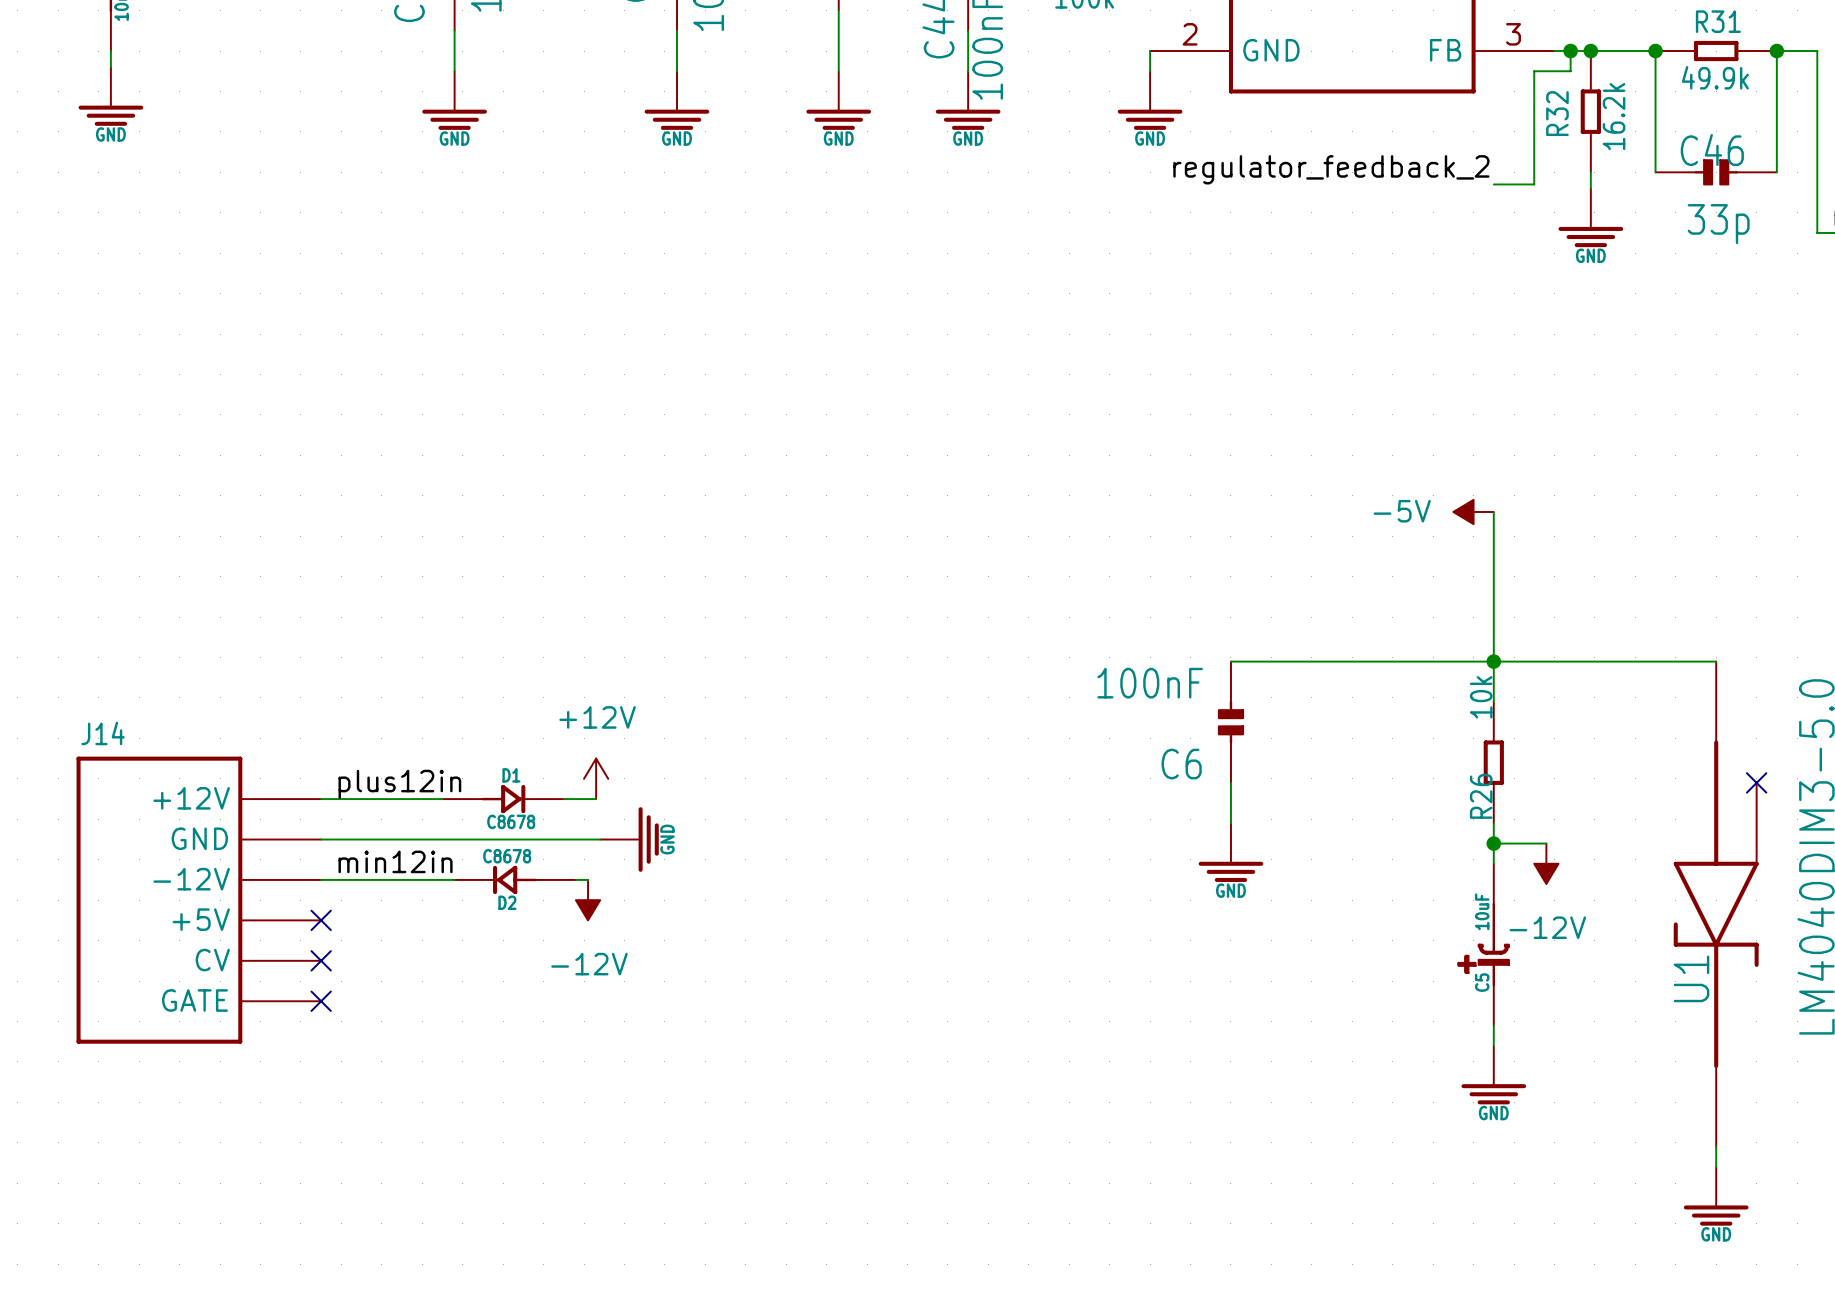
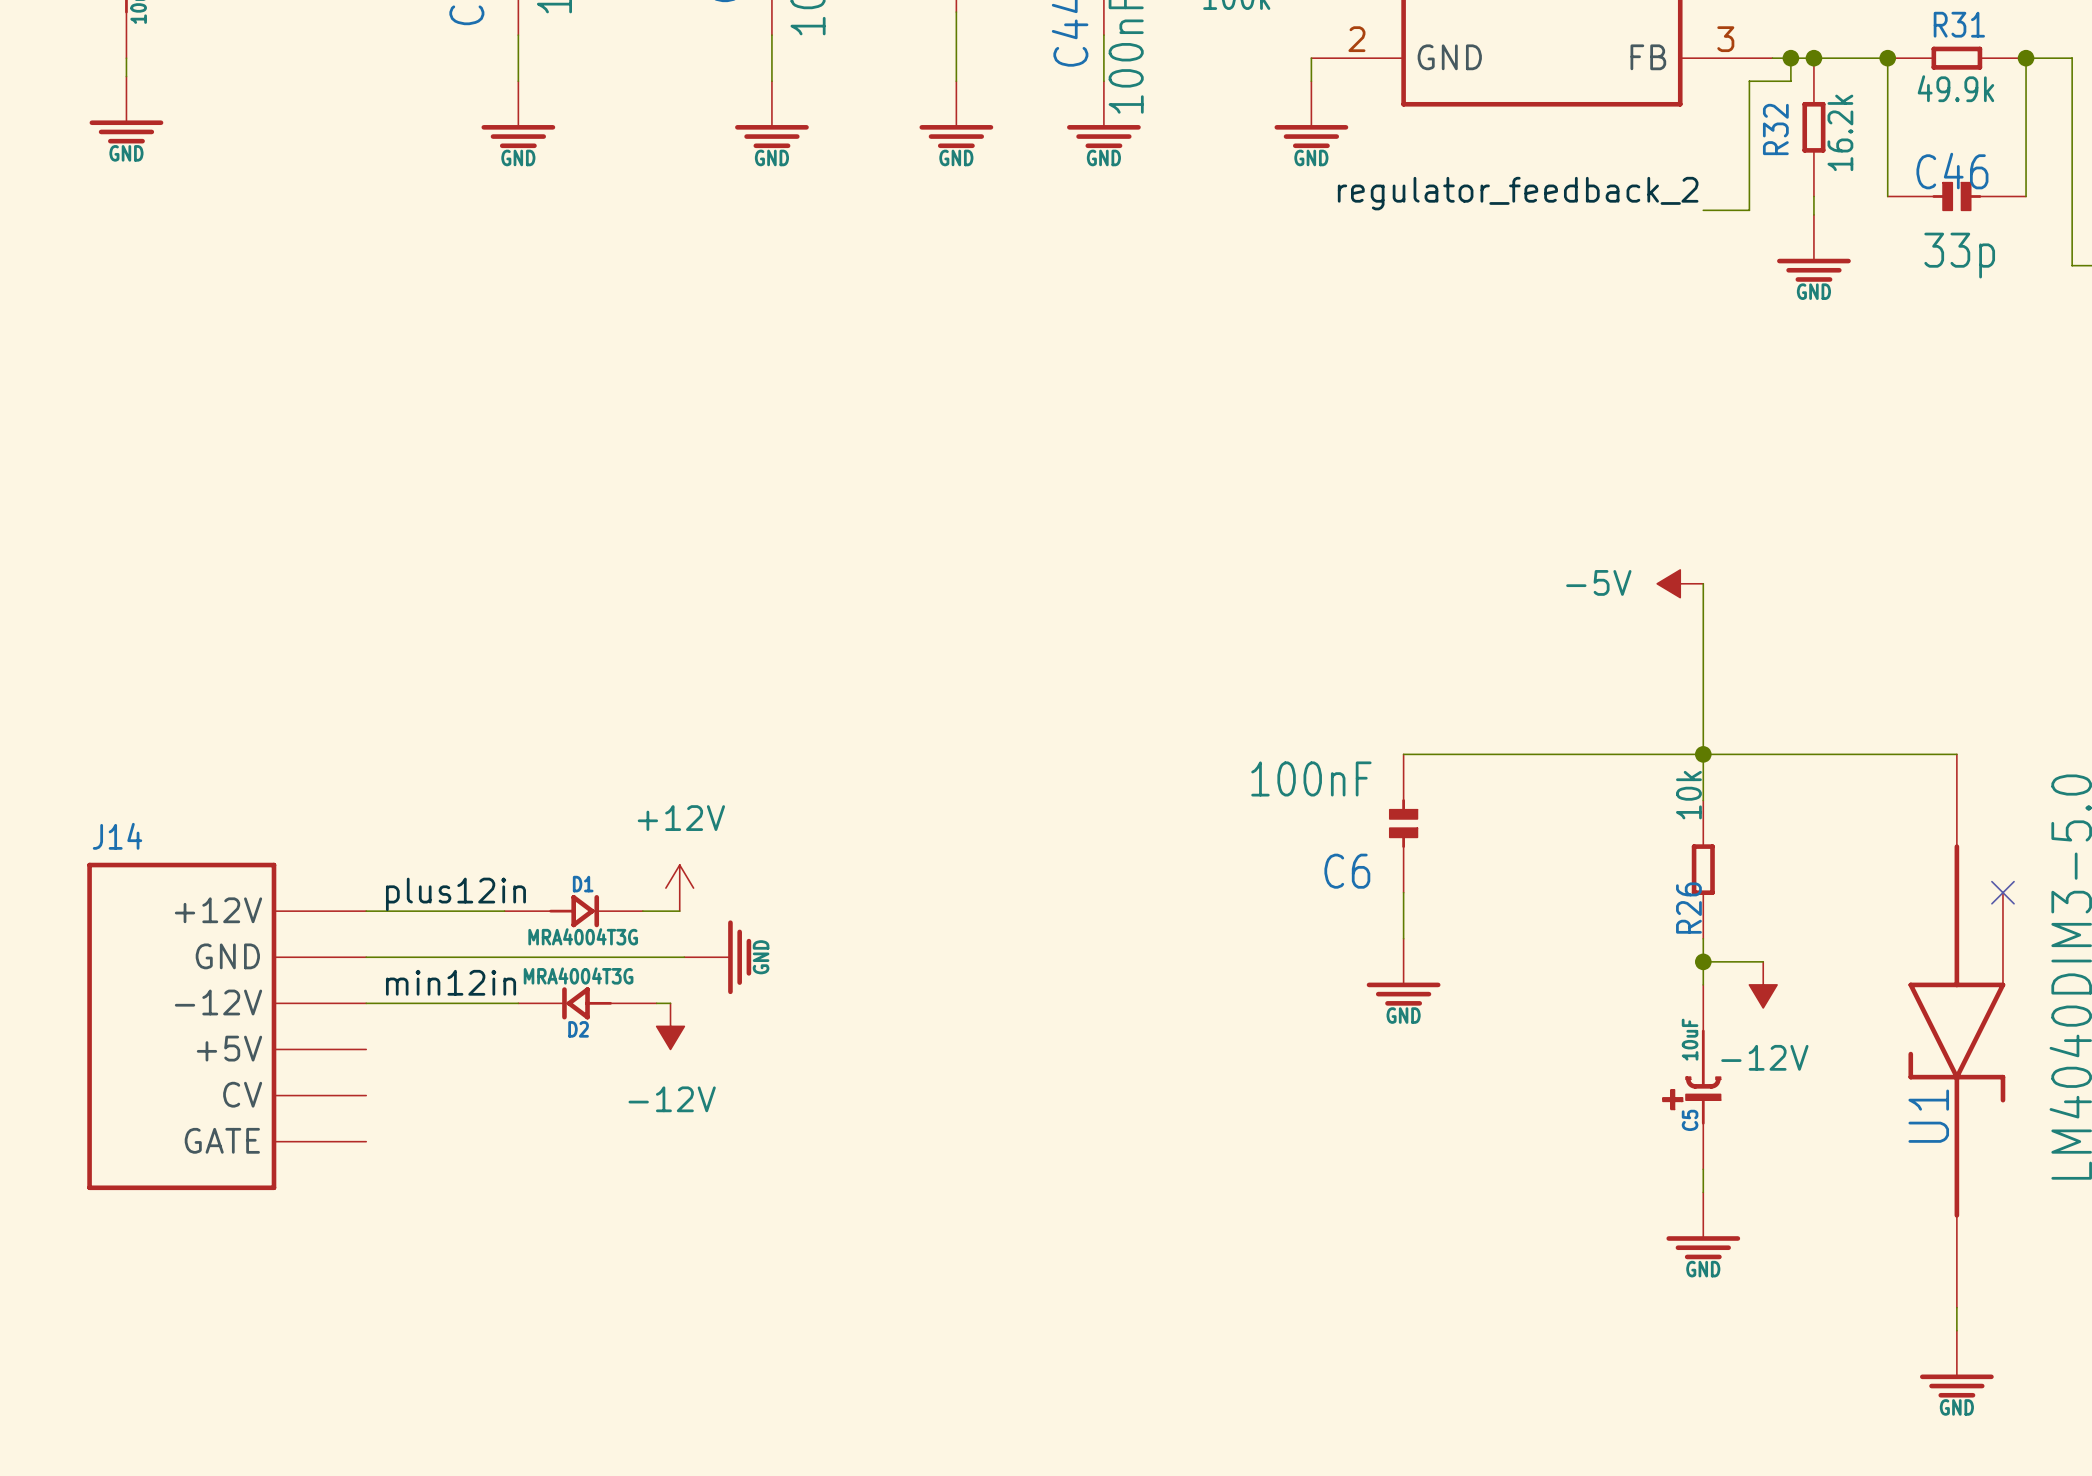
D1 value: C8678 (511, 821) -> MRA4004T3G (583, 936)
D2 value: C8678 (507, 856) -> MRA4004T3G (578, 975)
no-connect mark: (321, 920) -> none
no-connect mark: (321, 960) -> none
no-connect mark: (321, 1001) -> none

